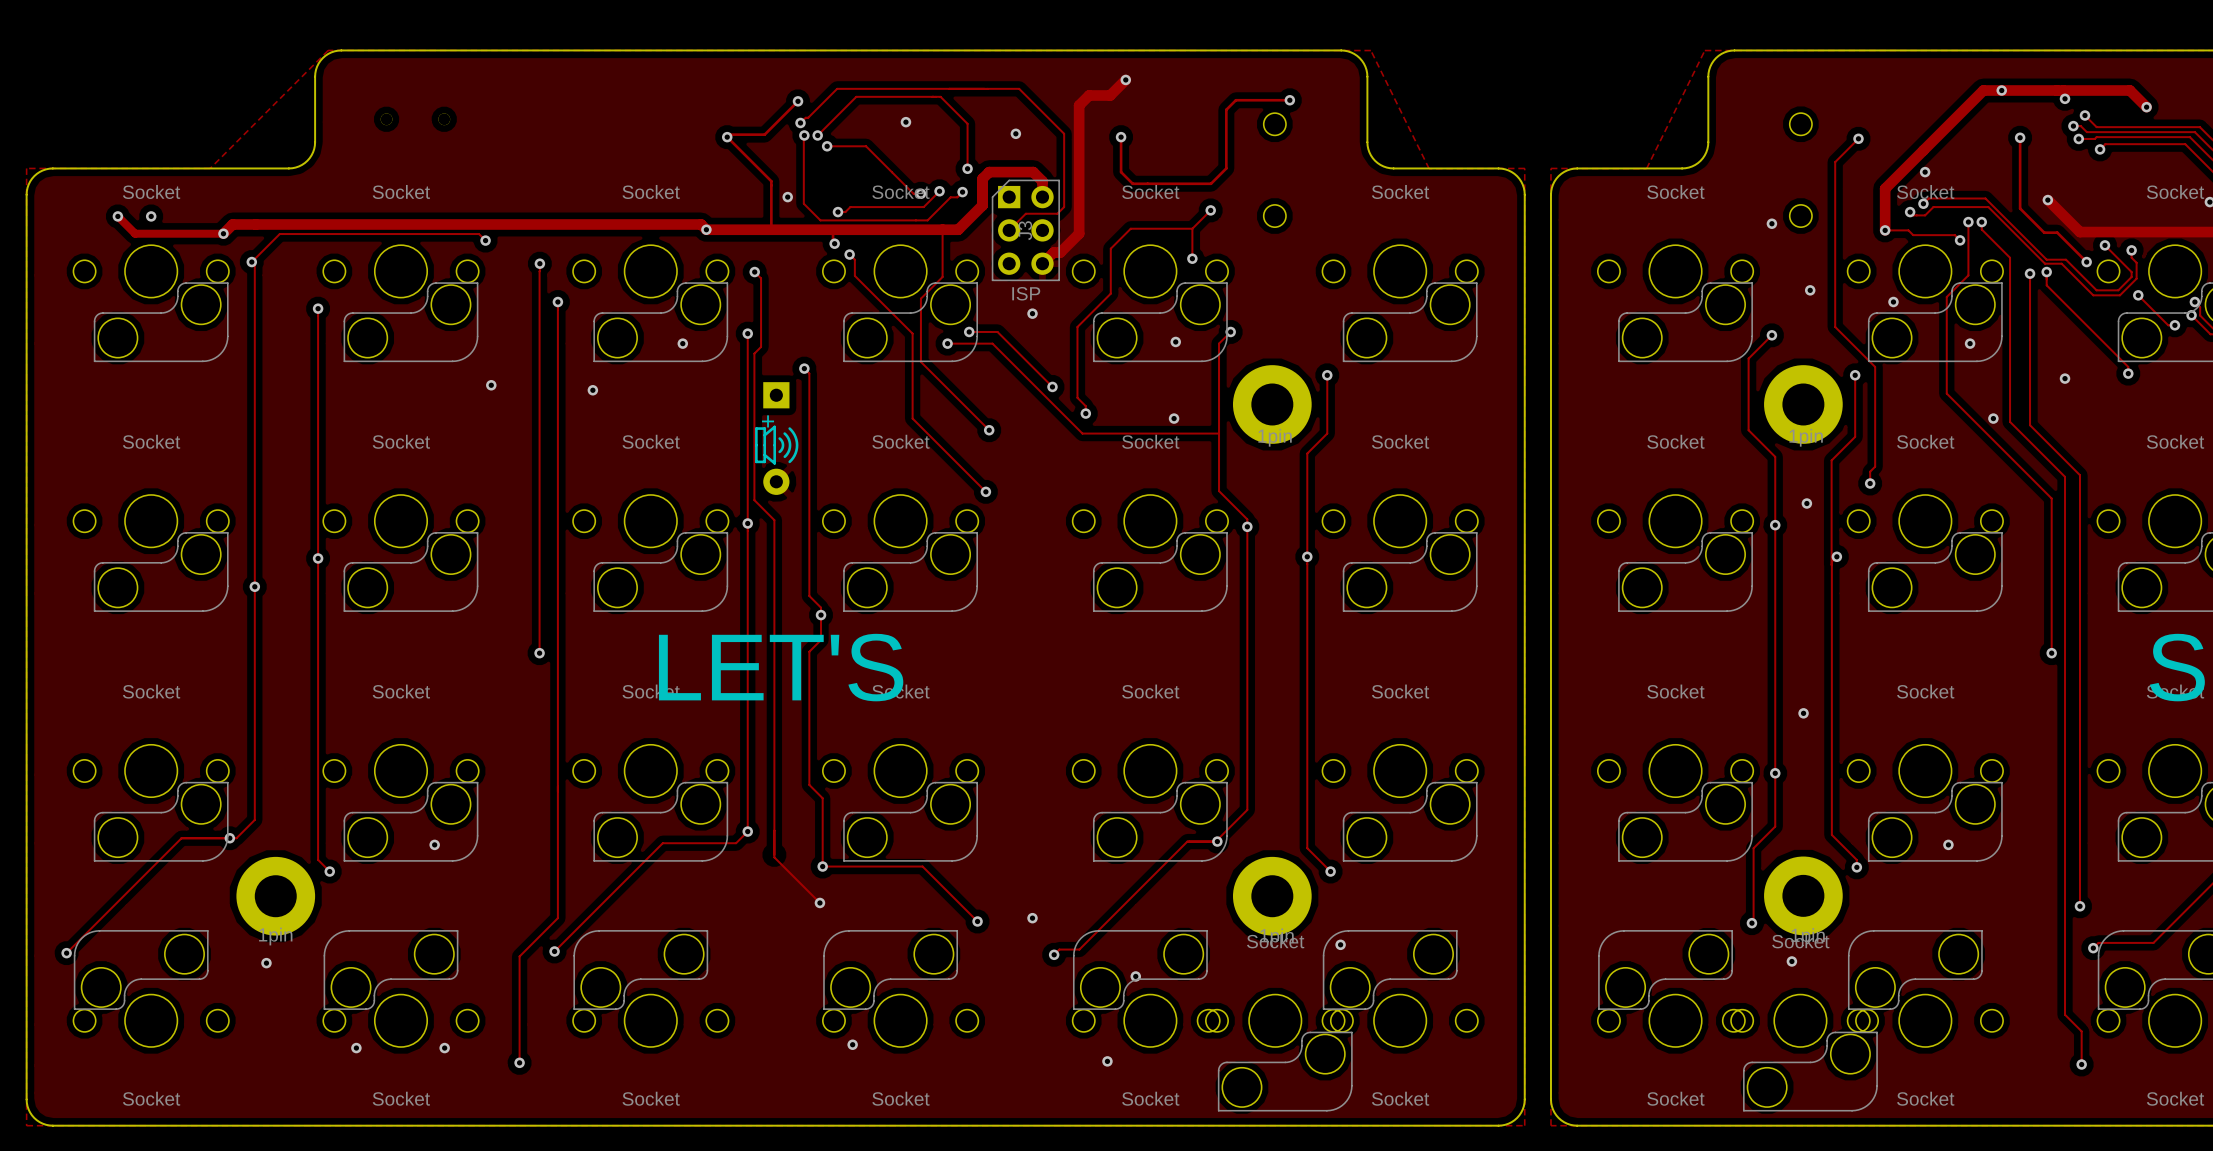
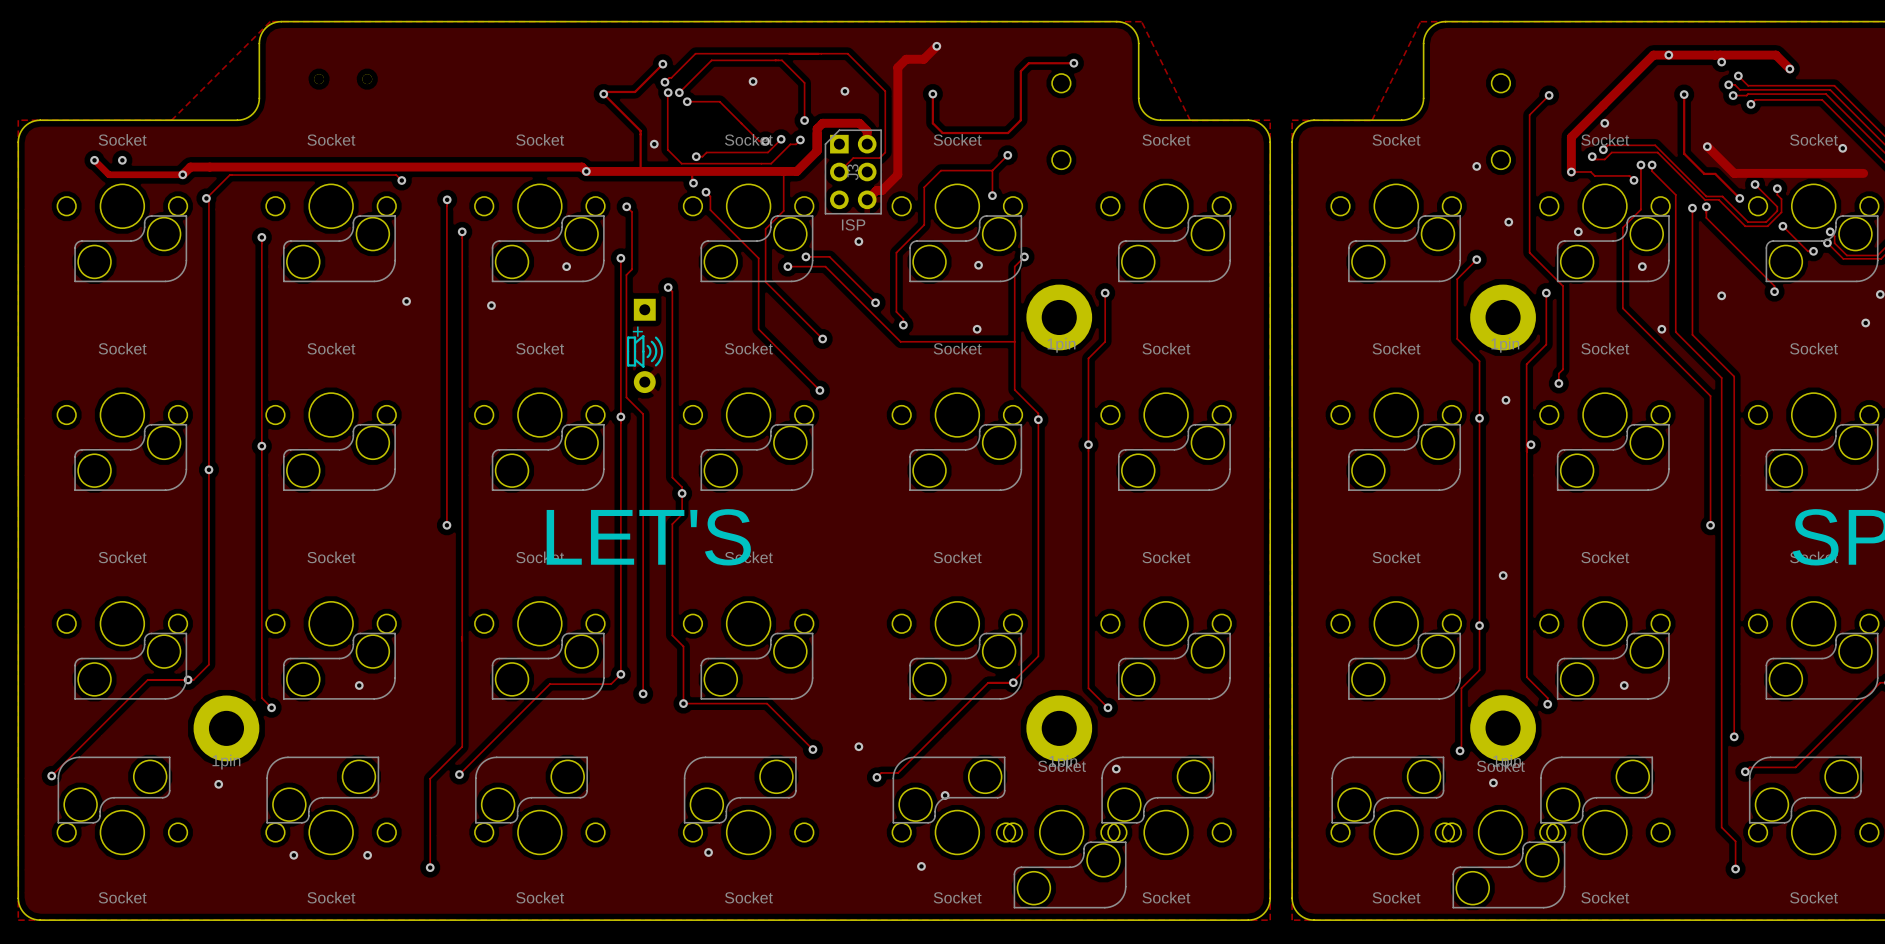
track: (774, 854) (774, 857) (819, 902) -> none
via position: (819, 902) -> (643, 693)

